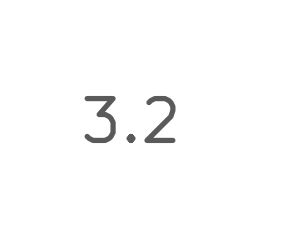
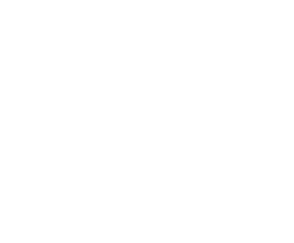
text: 3.2 (130, 119) -> none

